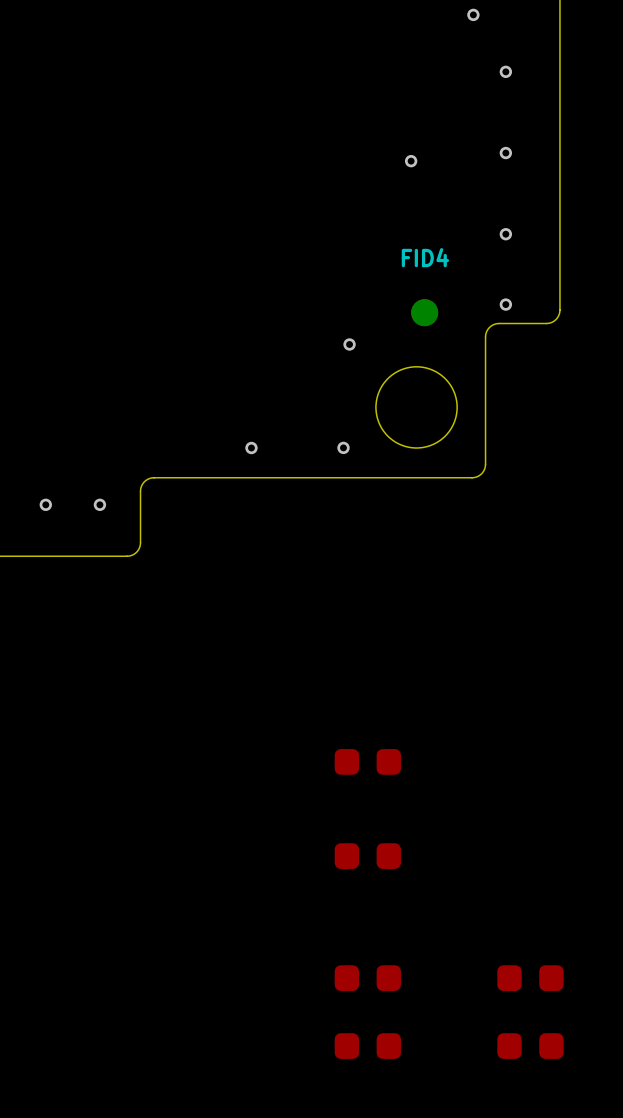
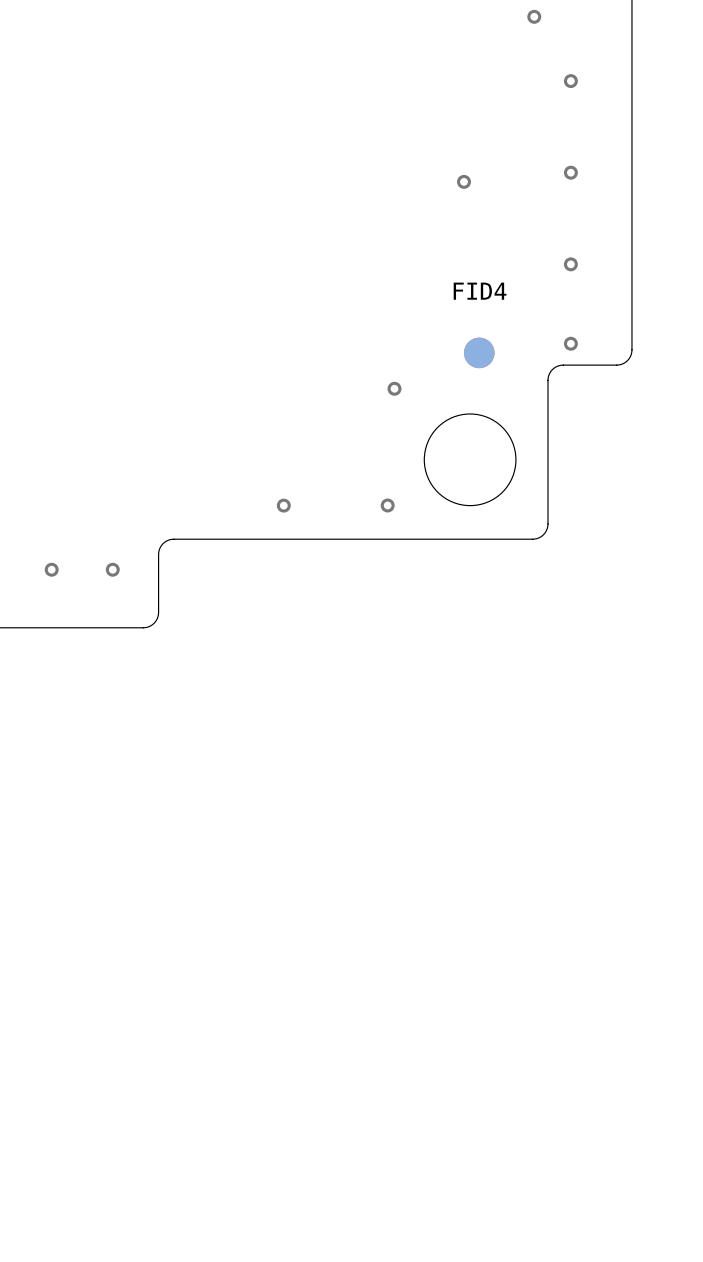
part: (367, 761) -> none
part: (367, 856) -> none
part: (367, 978) -> none
part: (530, 978) -> none
part: (367, 1046) -> none
part: (530, 1046) -> none

